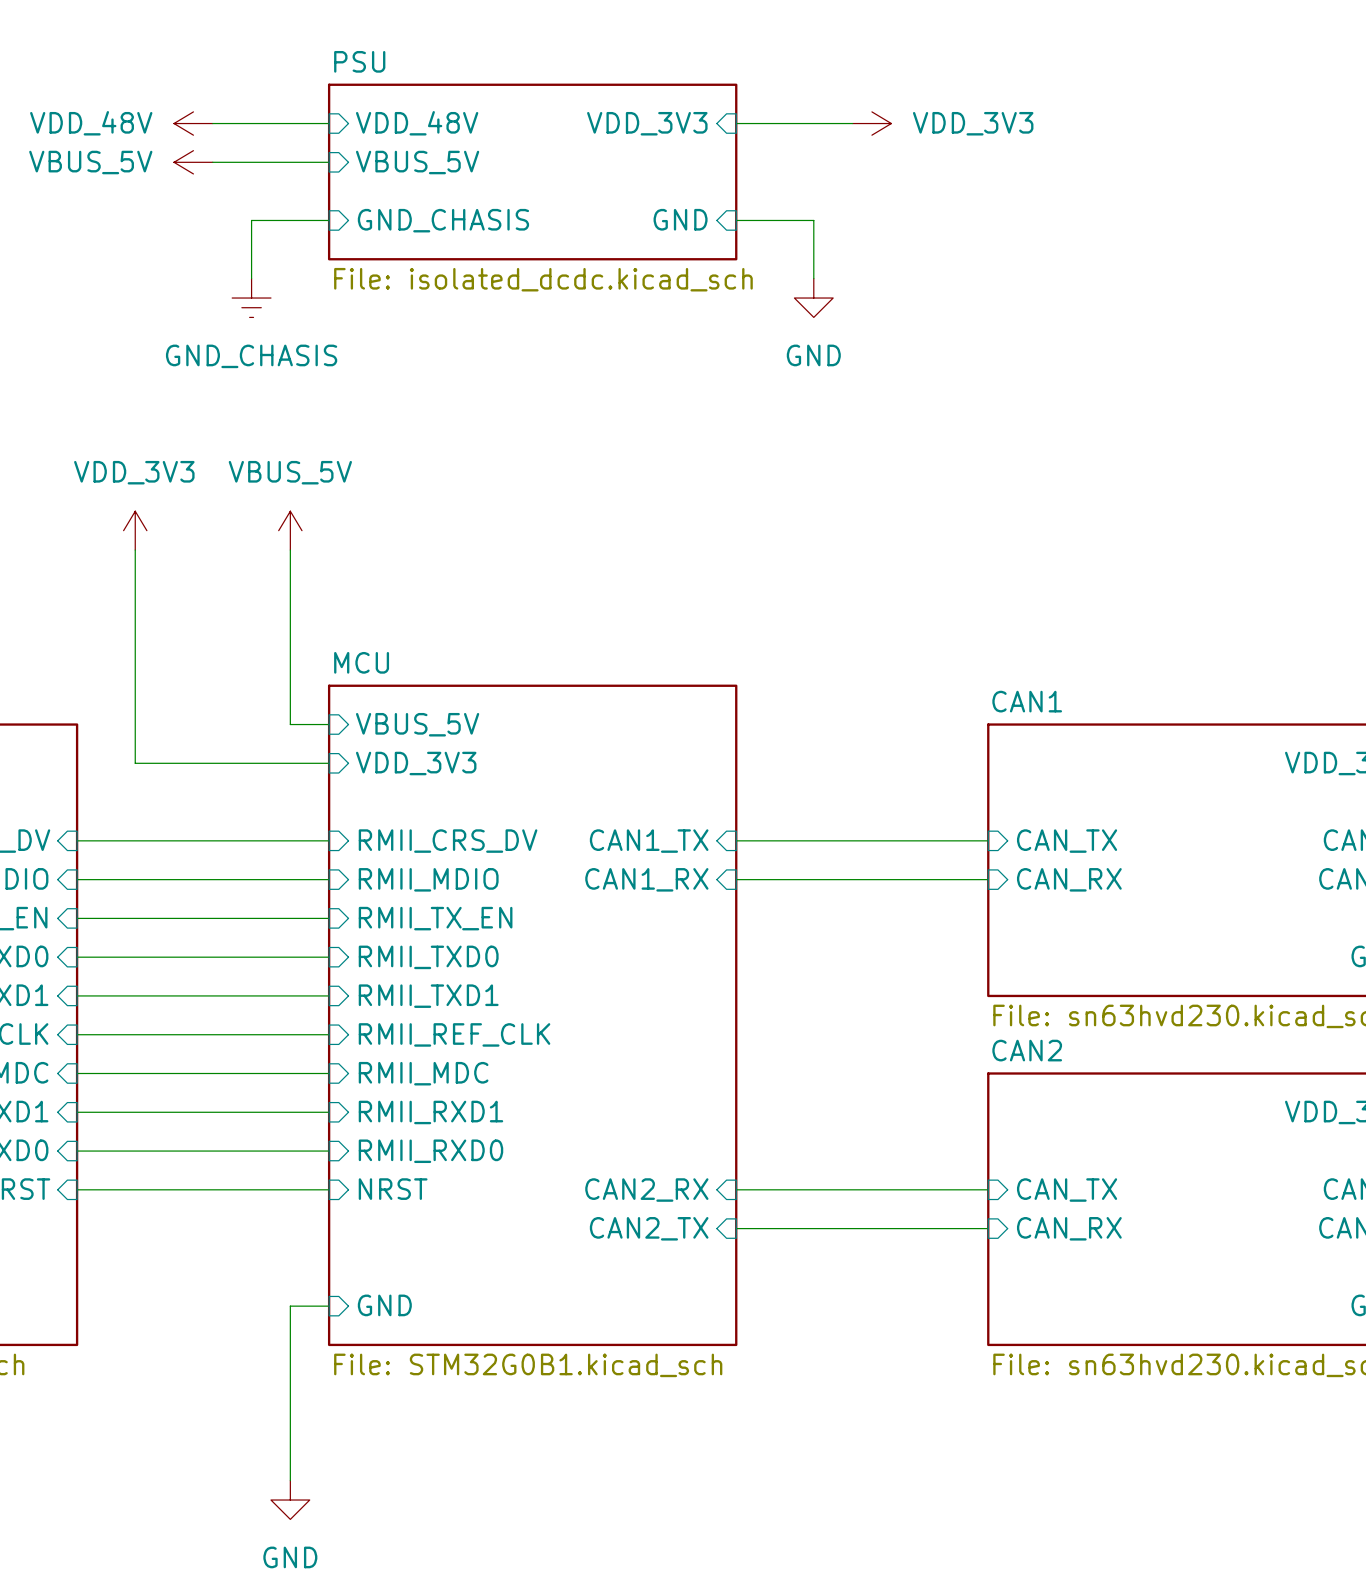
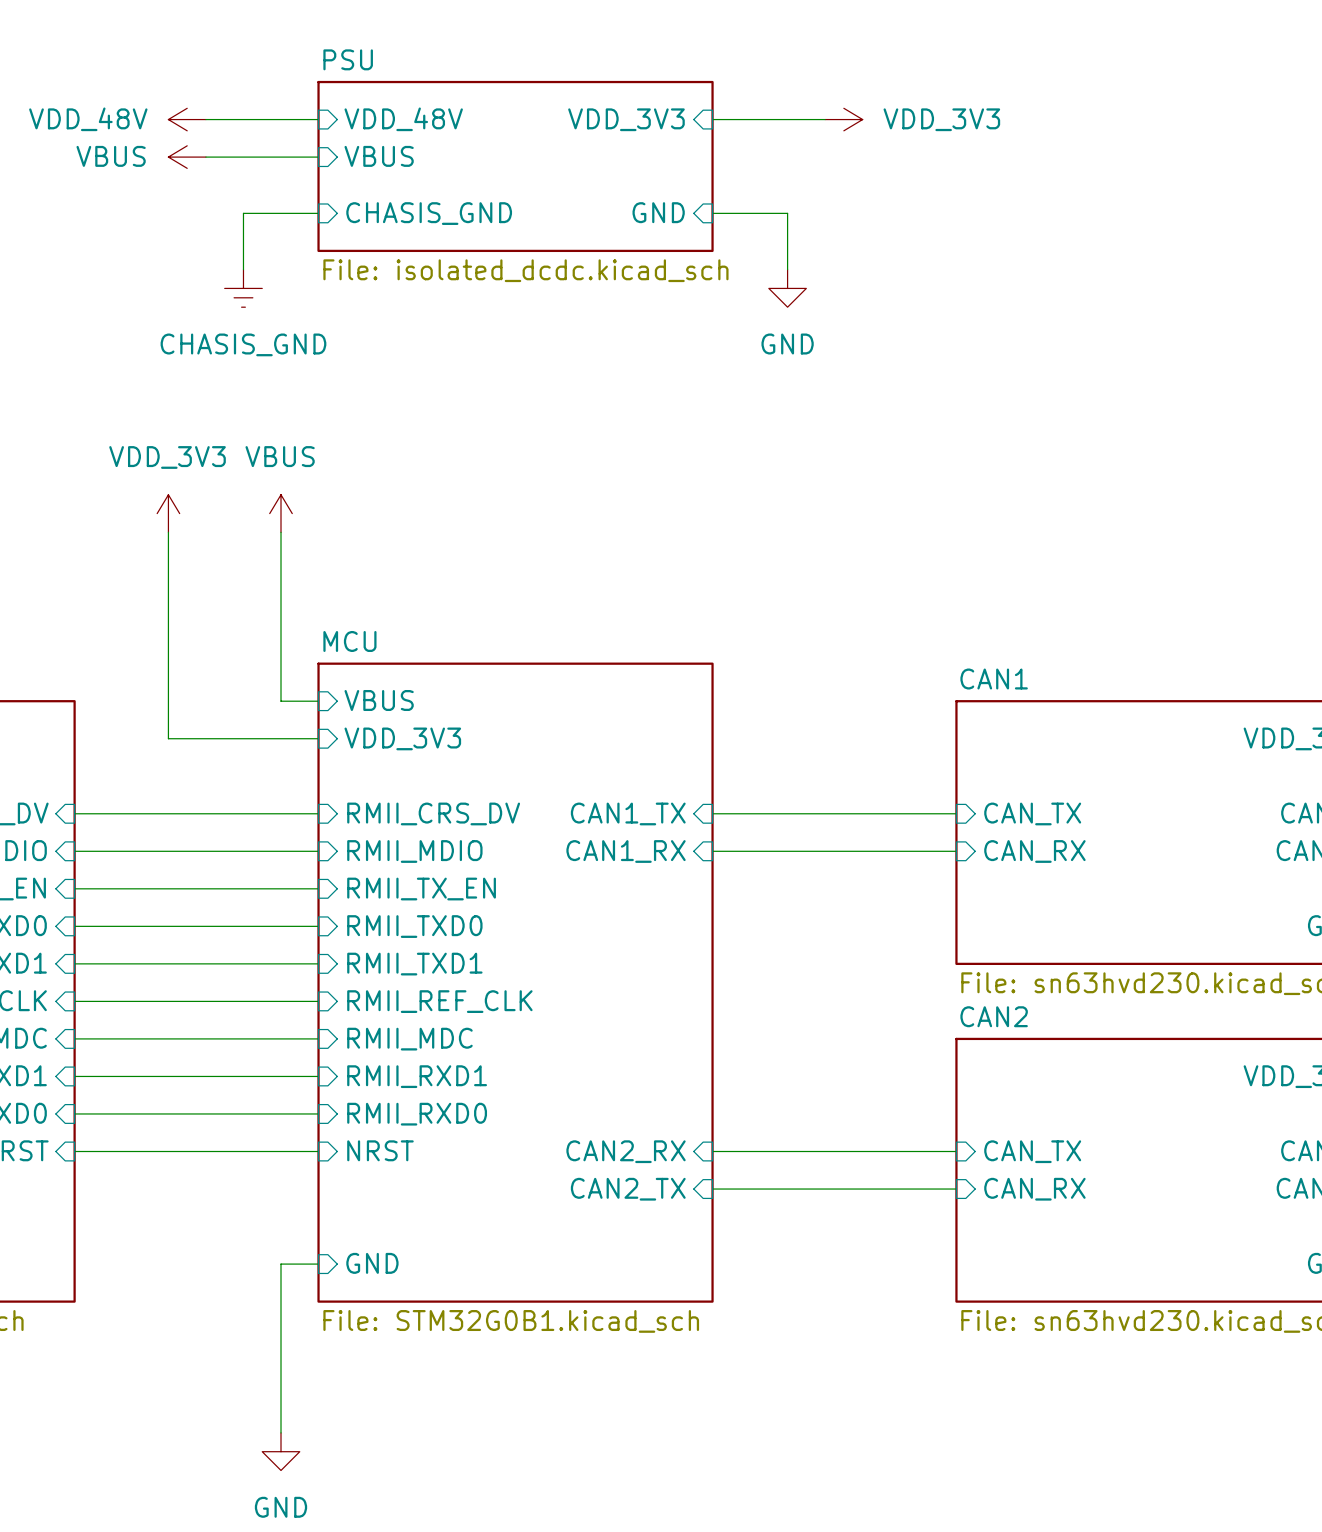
power symbol: VBUS_5V (193, 162) -> VBUS (187, 157)
sheet pin: VBUS_5V (417, 162) -> VBUS (379, 156)
sheet pin: GND_CHASIS (443, 220) -> CHASIS_GND (429, 213)
power symbol: GND_CHASIS (251, 298) -> CHASIS_GND (243, 288)
power symbol position: VDD_3V3 (135, 530) -> VDD_3V3 (168, 513)
power symbol: VBUS_5V (290, 530) -> VBUS (281, 513)
wire: (135, 550) (135, 763) (174, 763) -> (168, 532) (168, 738)
sheet pin: VBUS_5V (417, 724) -> VBUS (379, 700)

